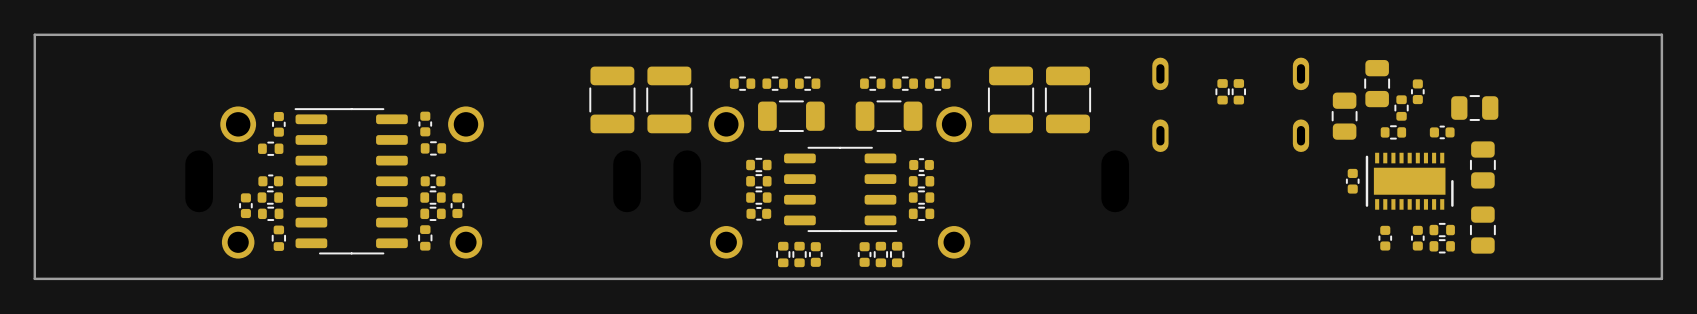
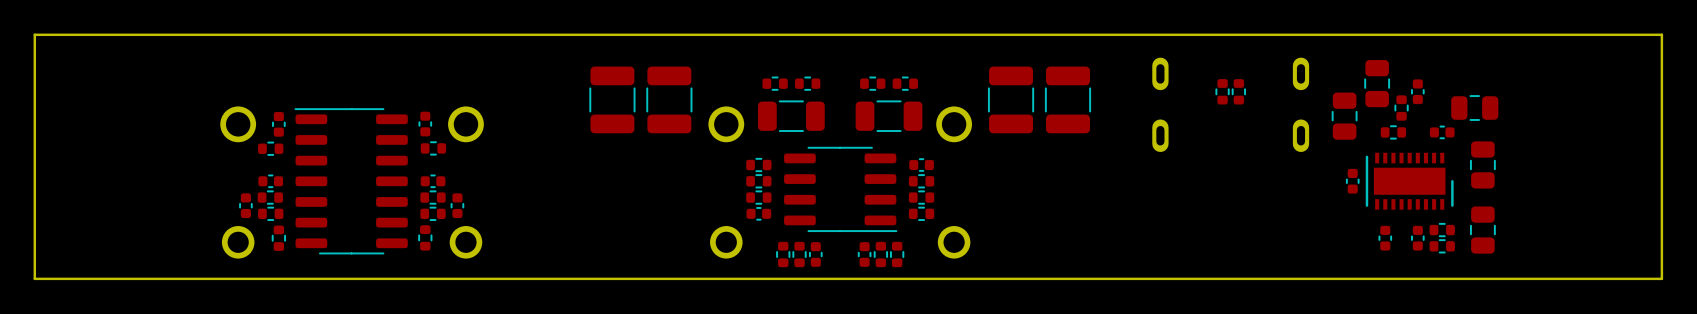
part: (742, 83) -> none
part: (937, 83) -> none

